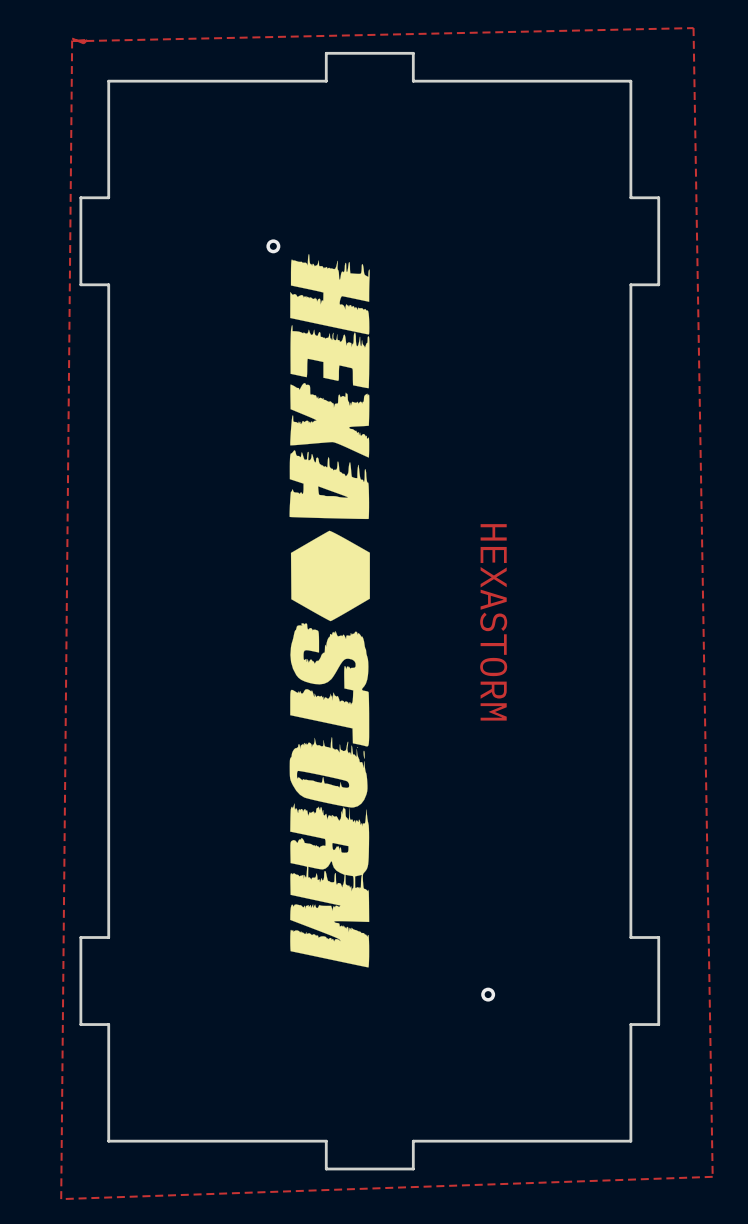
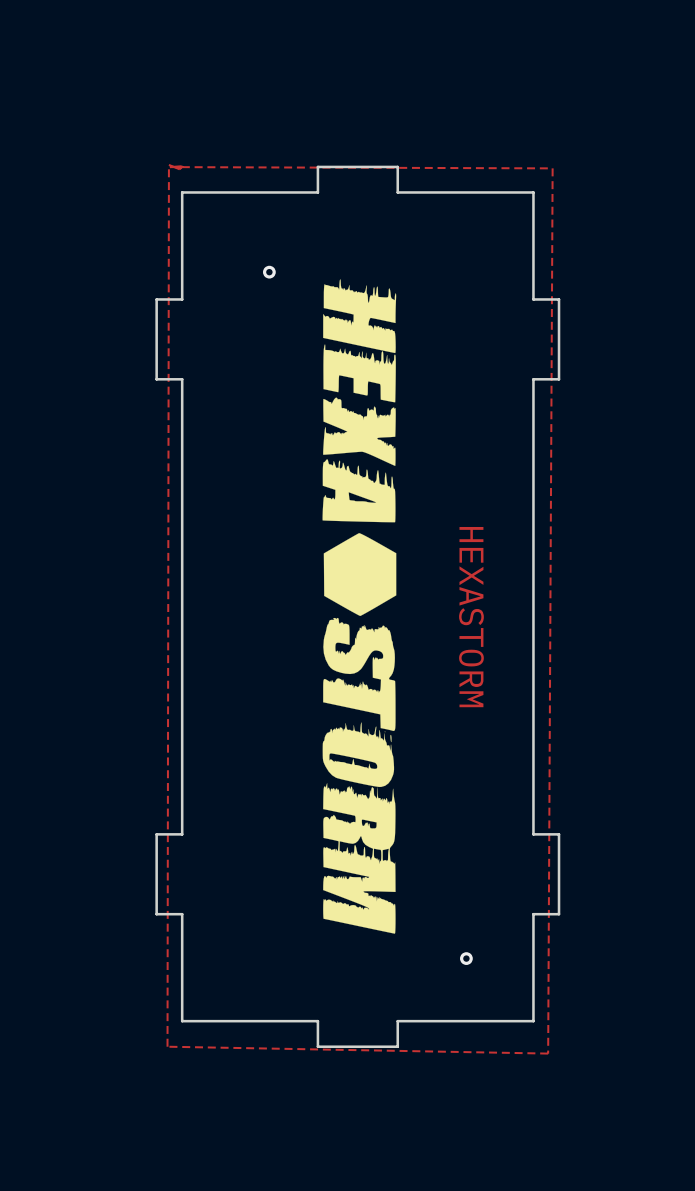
zone outline: (693, 28) (86, 41) (73, 40) (87, 39) (83, 43) (72, 38) (61, 1199) (712, 1176) (693, 28) -> (168, 164) (167, 1046) (548, 1053) (552, 168) (169, 167) (182, 166) (179, 169) (168, 164)
board edge: (326, 53) (326, 81) (108, 81) (108, 197) (80, 197) (80, 284) (108, 284) (108, 937) (80, 937) (80, 1024) (108, 1024) (108, 1141) (326, 1141) (326, 1169) (413, 1169) (413, 1141) (630, 1141) (630, 1024) (658, 1024) (658, 937) (630, 937) (630, 284) (658, 284) (658, 197) (630, 197) (630, 81) (413, 81) (413, 53) (326, 53) -> (317, 166) (317, 192) (182, 192) (182, 299) (156, 299) (156, 379) (182, 379) (182, 834) (156, 834) (156, 914) (182, 914) (182, 1021) (317, 1021) (317, 1046) (397, 1046) (397, 1021) (533, 1021) (533, 914) (559, 914) (559, 834) (533, 834) (533, 379) (559, 379) (559, 299) (533, 299) (533, 192) (397, 192) (397, 166) (317, 166)
drawing position: (329, 610) -> (359, 606)

